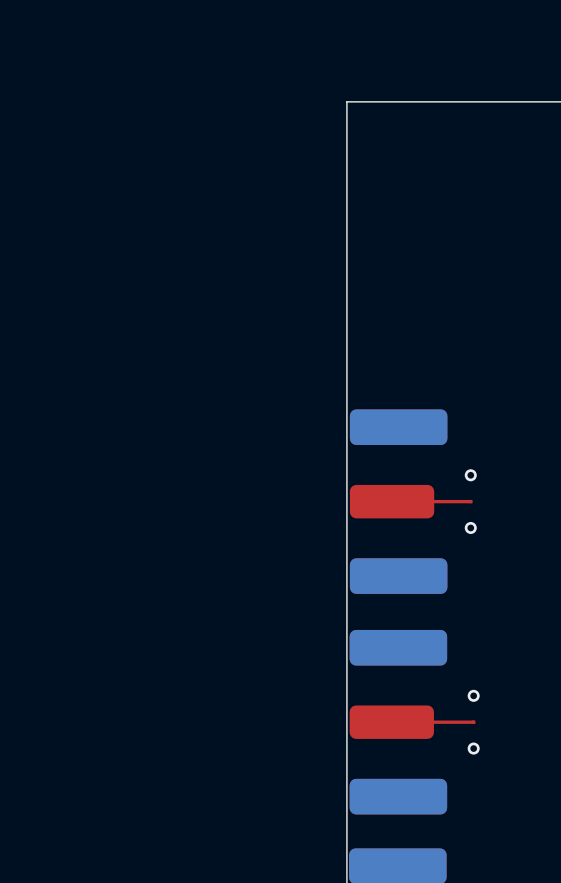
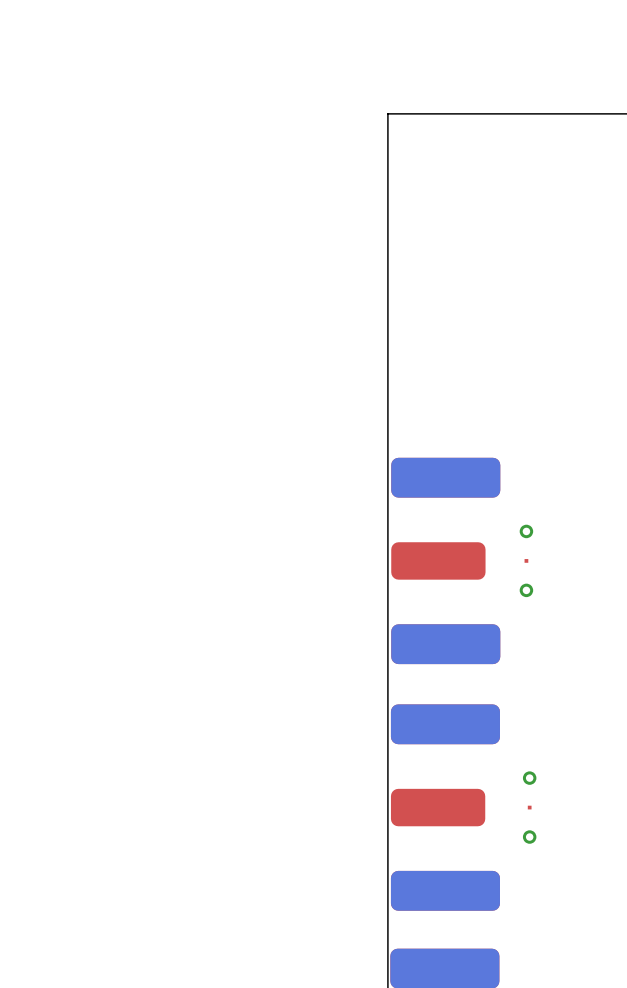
top track: (470, 501) (392, 501) -> none
top track: (473, 722) (391, 722) -> none

